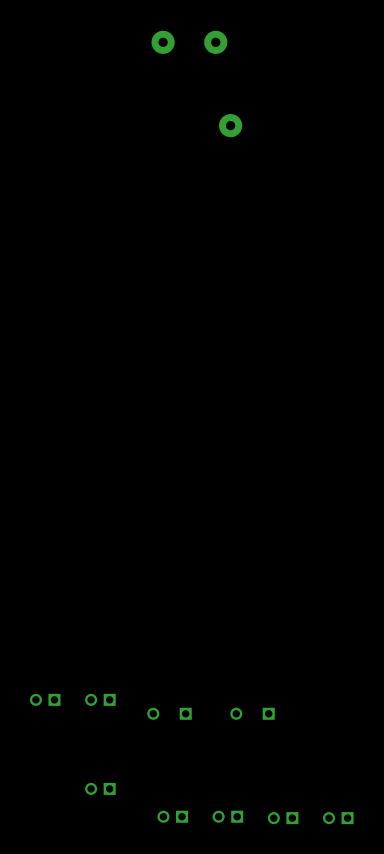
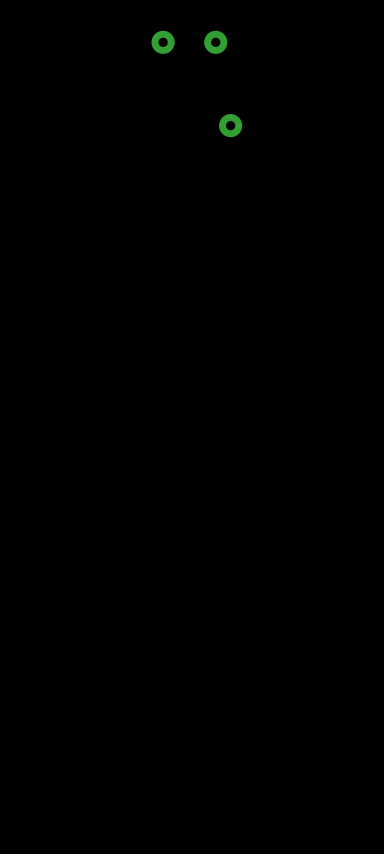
part: (45, 699) -> none
part: (100, 699) -> none
part: (169, 713) -> none
part: (252, 713) -> none
part: (100, 788) -> none
part: (172, 816) -> none
part: (227, 816) -> none
part: (283, 818) -> none
part: (338, 818) -> none

